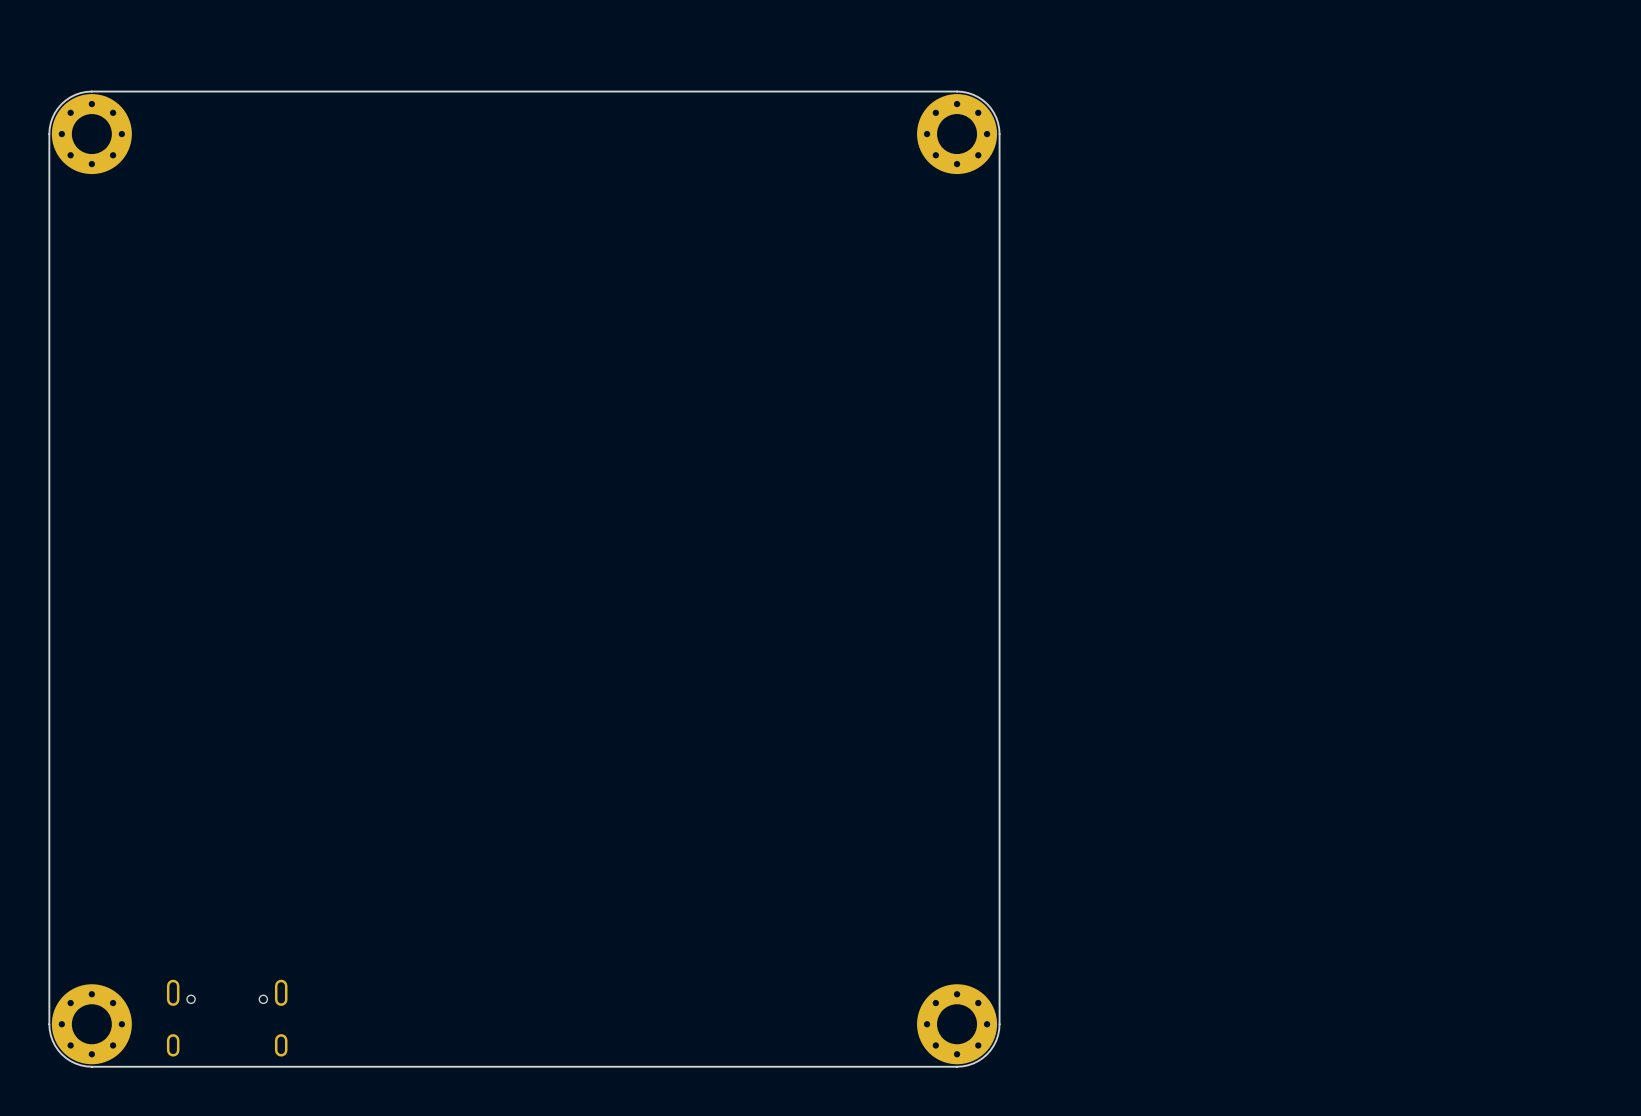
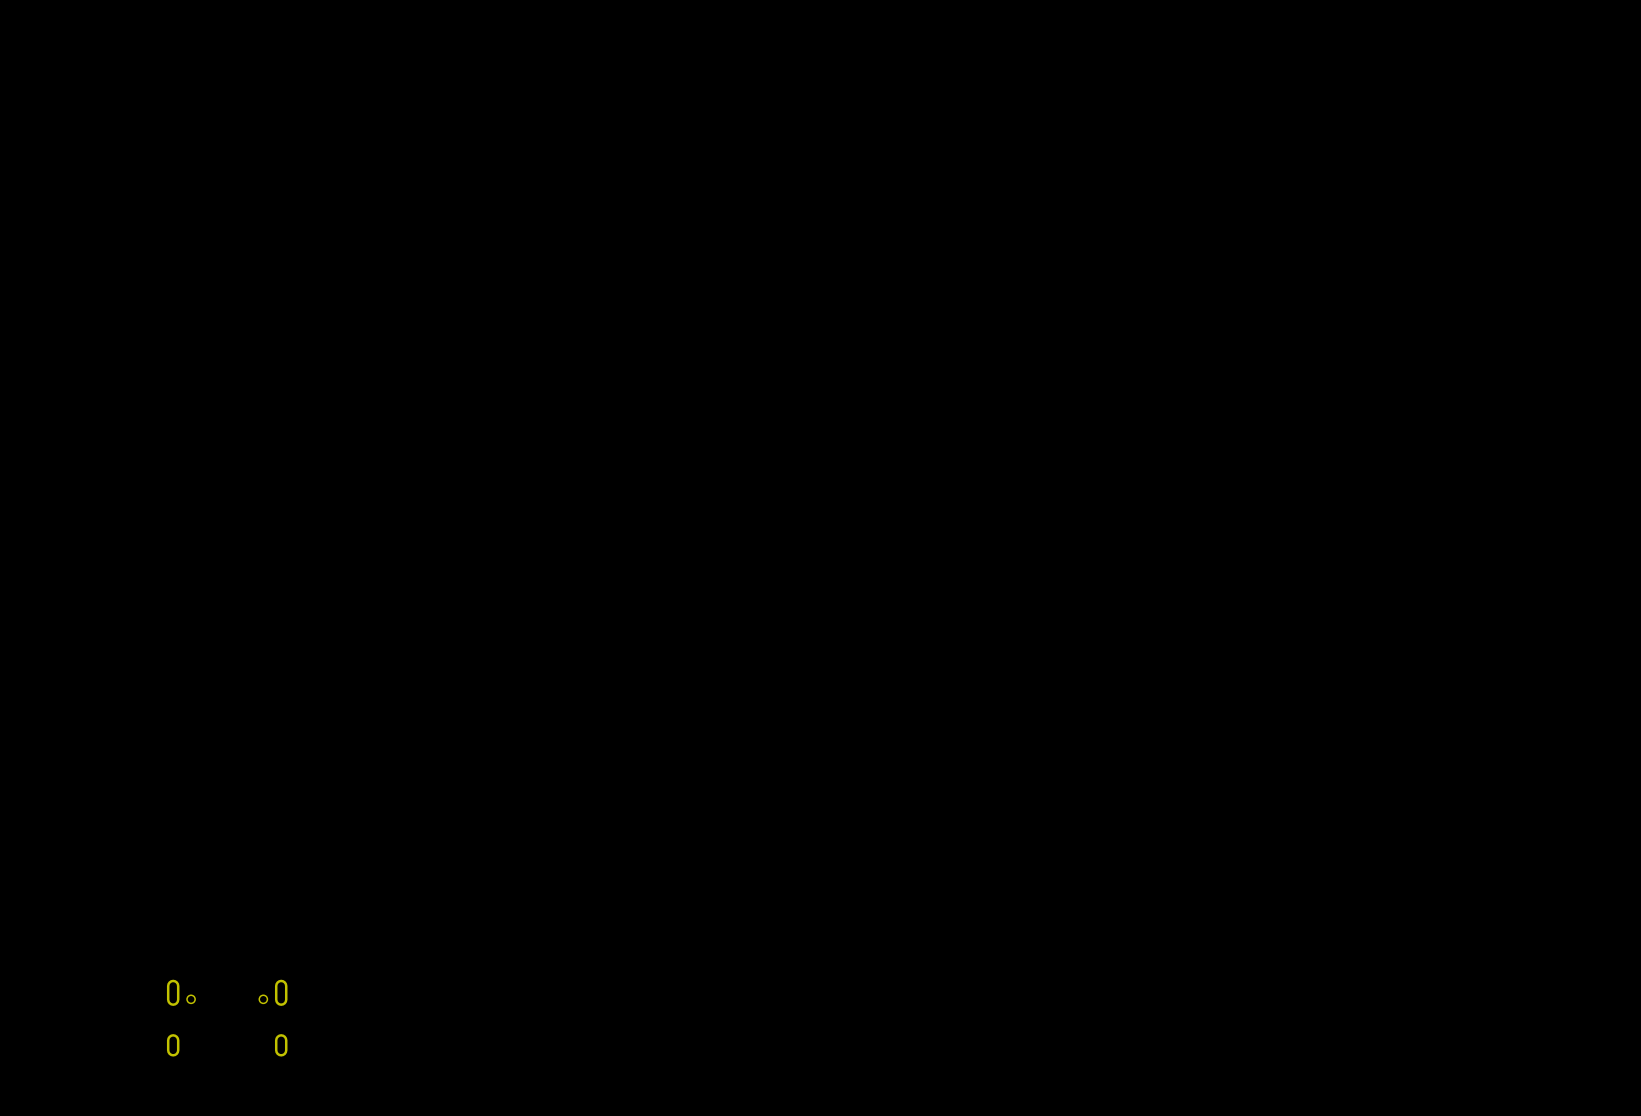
board edge: (957, 91) (91, 91) (75, 94) (61, 103) (52, 117) (49, 134) (49, 1024) (52, 1040) (61, 1054) (75, 1063) (91, 1066) (957, 1066) (973, 1063) (987, 1054) (996, 1040) (999, 1024) (999, 134) (996, 117) (987, 103) (973, 94) (957, 91) -> none
part: (91, 134) -> none
part: (957, 134) -> none
part: (91, 1024) -> none
part: (957, 1024) -> none

